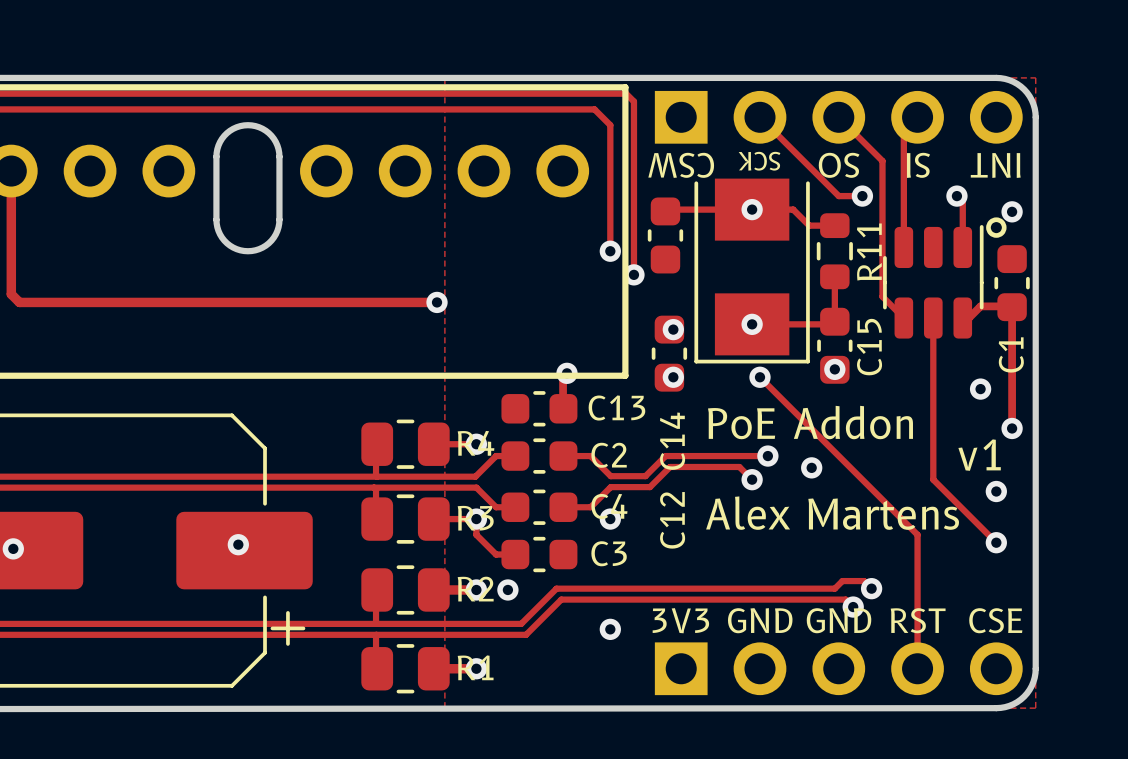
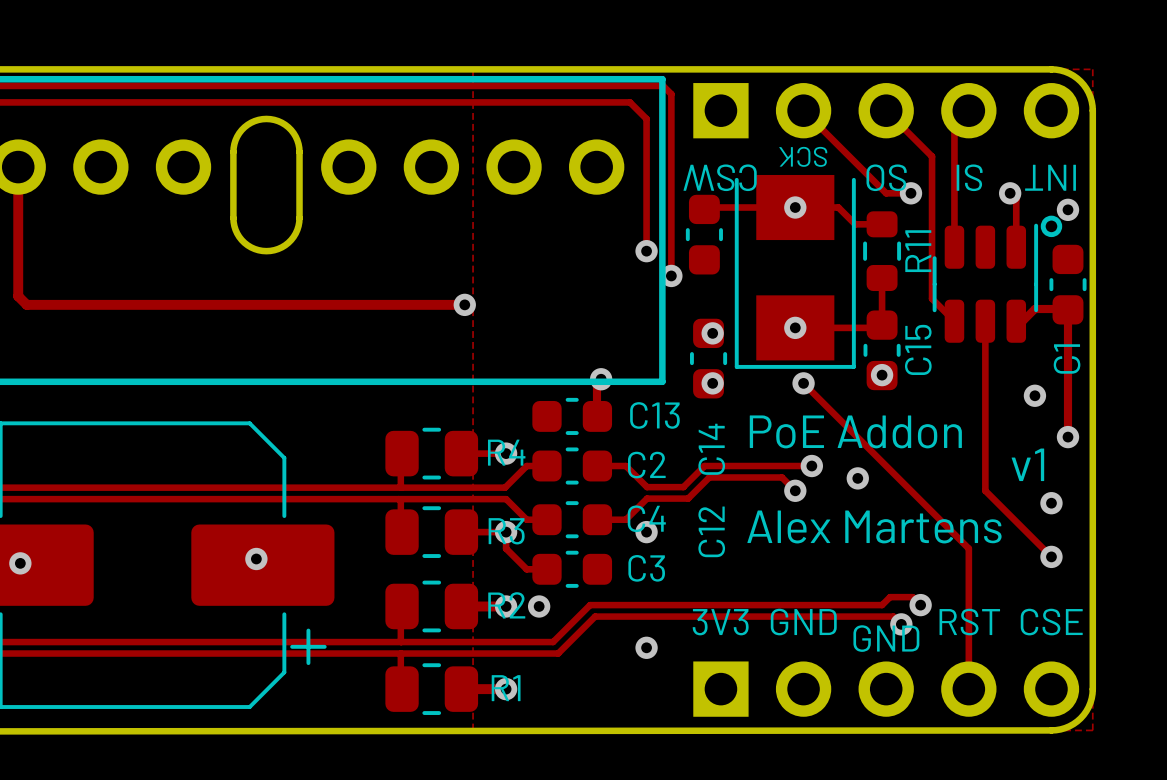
text position: CSW (681, 165) -> CSW (720, 177)
text position: SO (839, 165) -> SO (886, 177)
text position: SI (918, 165) -> SI (969, 177)
text position: INT (995, 165) -> INT (1050, 177)
text position: 3V3 (680, 620) -> 3V3 (720, 622)
text position: GND (760, 620) -> GND (803, 622)
text position: RST (918, 620) -> RST (969, 622)
text position: CSE (995, 620) -> CSE (1051, 622)

